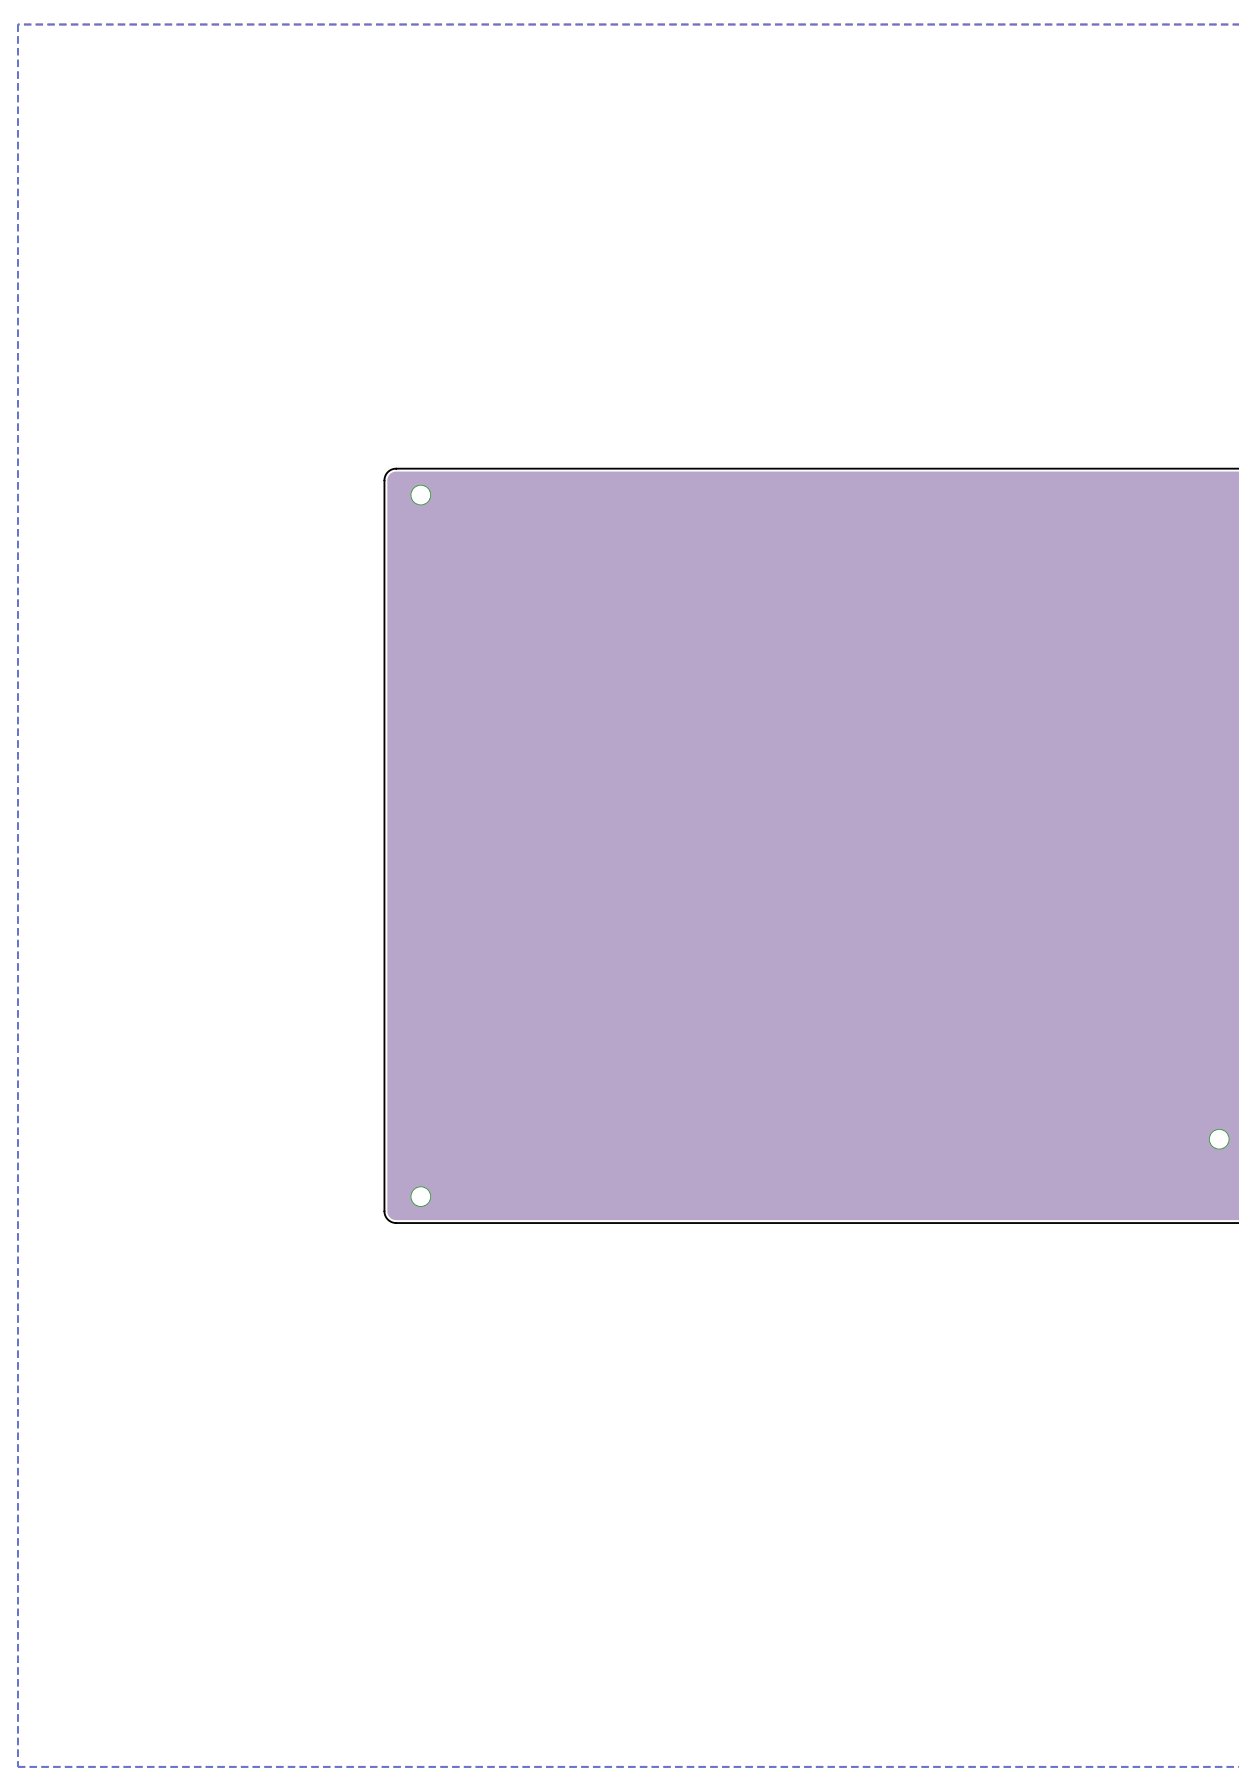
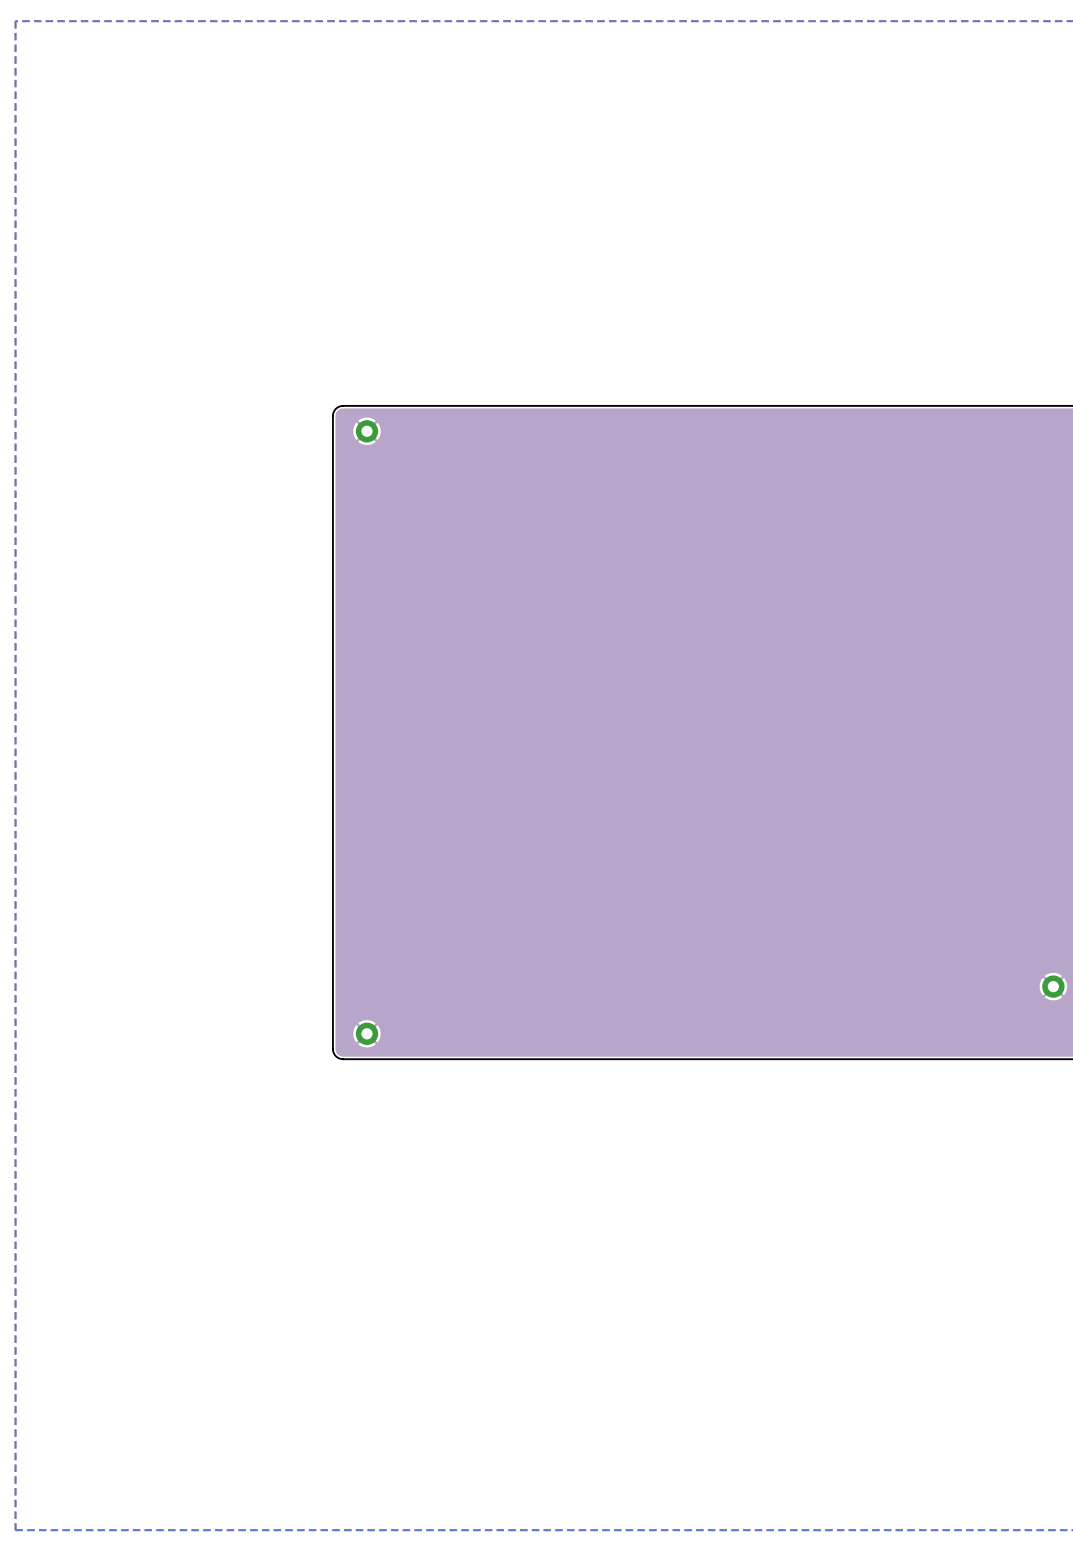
part footprint: [410, 484, 432, 506] -> [355, 420, 379, 443]
part footprint: [1208, 1128, 1230, 1150] -> [1042, 975, 1065, 998]
part footprint: [410, 1186, 432, 1207] -> [355, 1022, 379, 1045]

